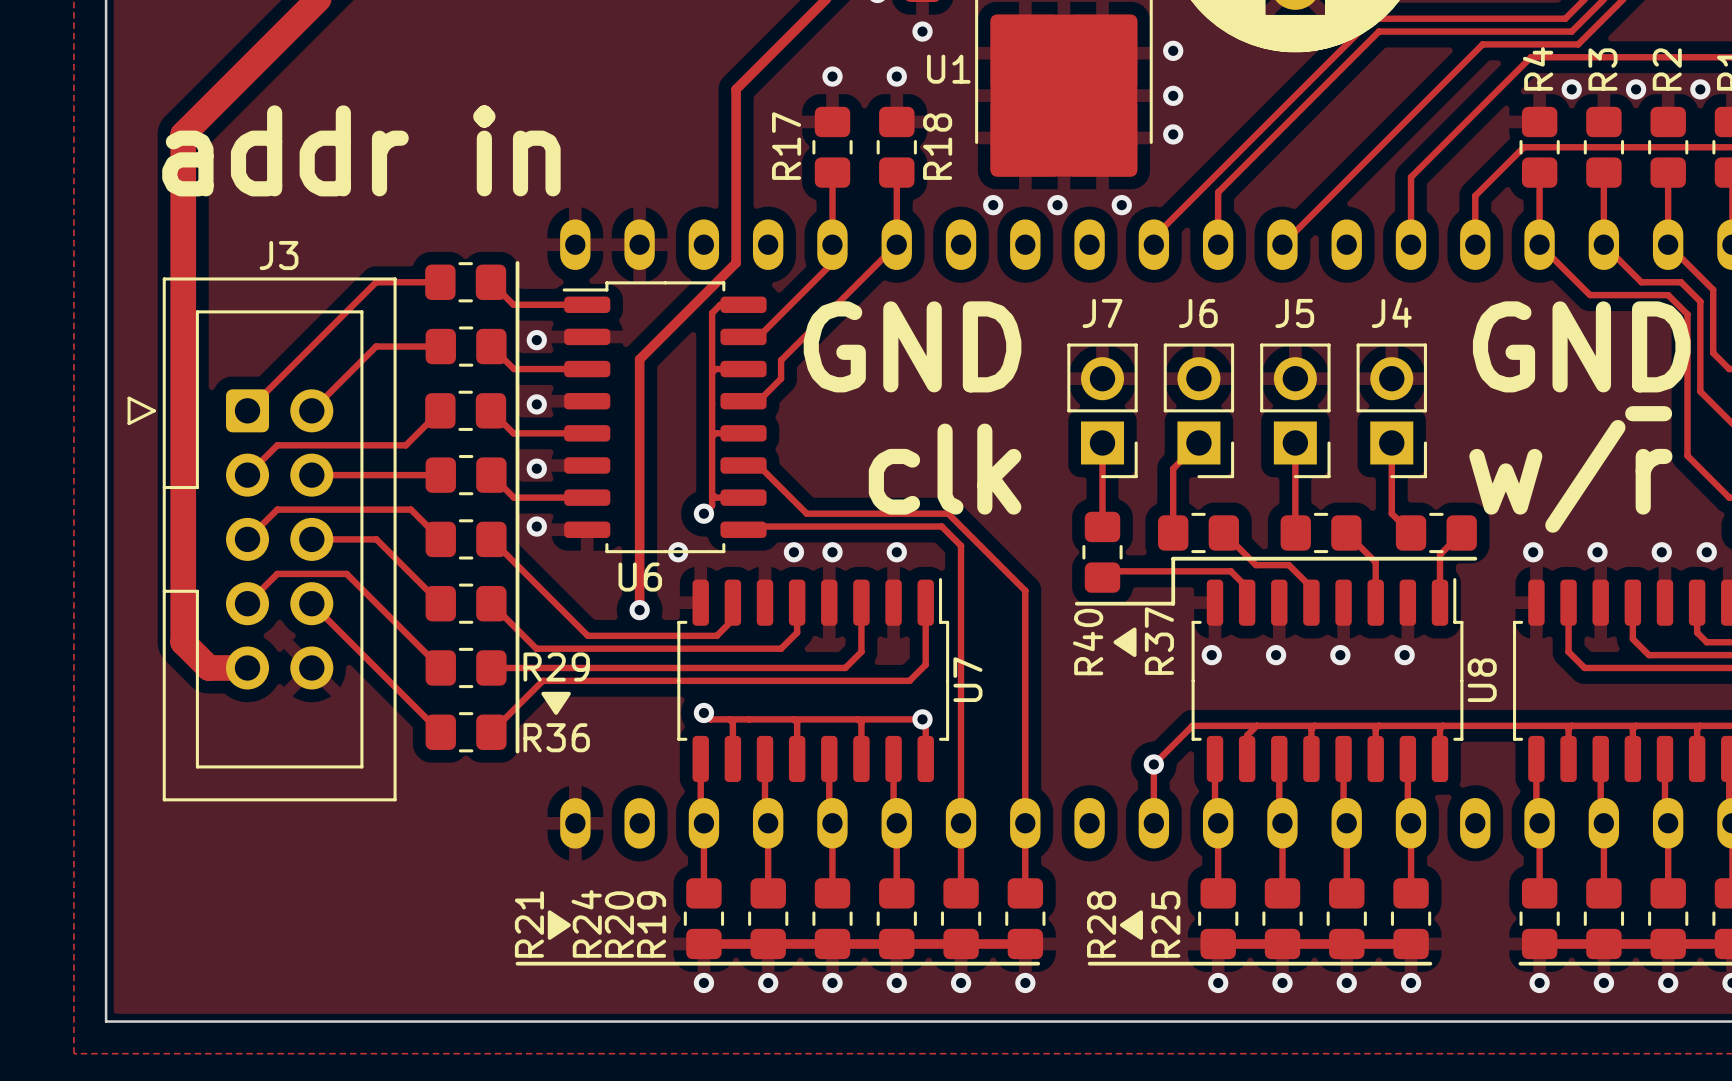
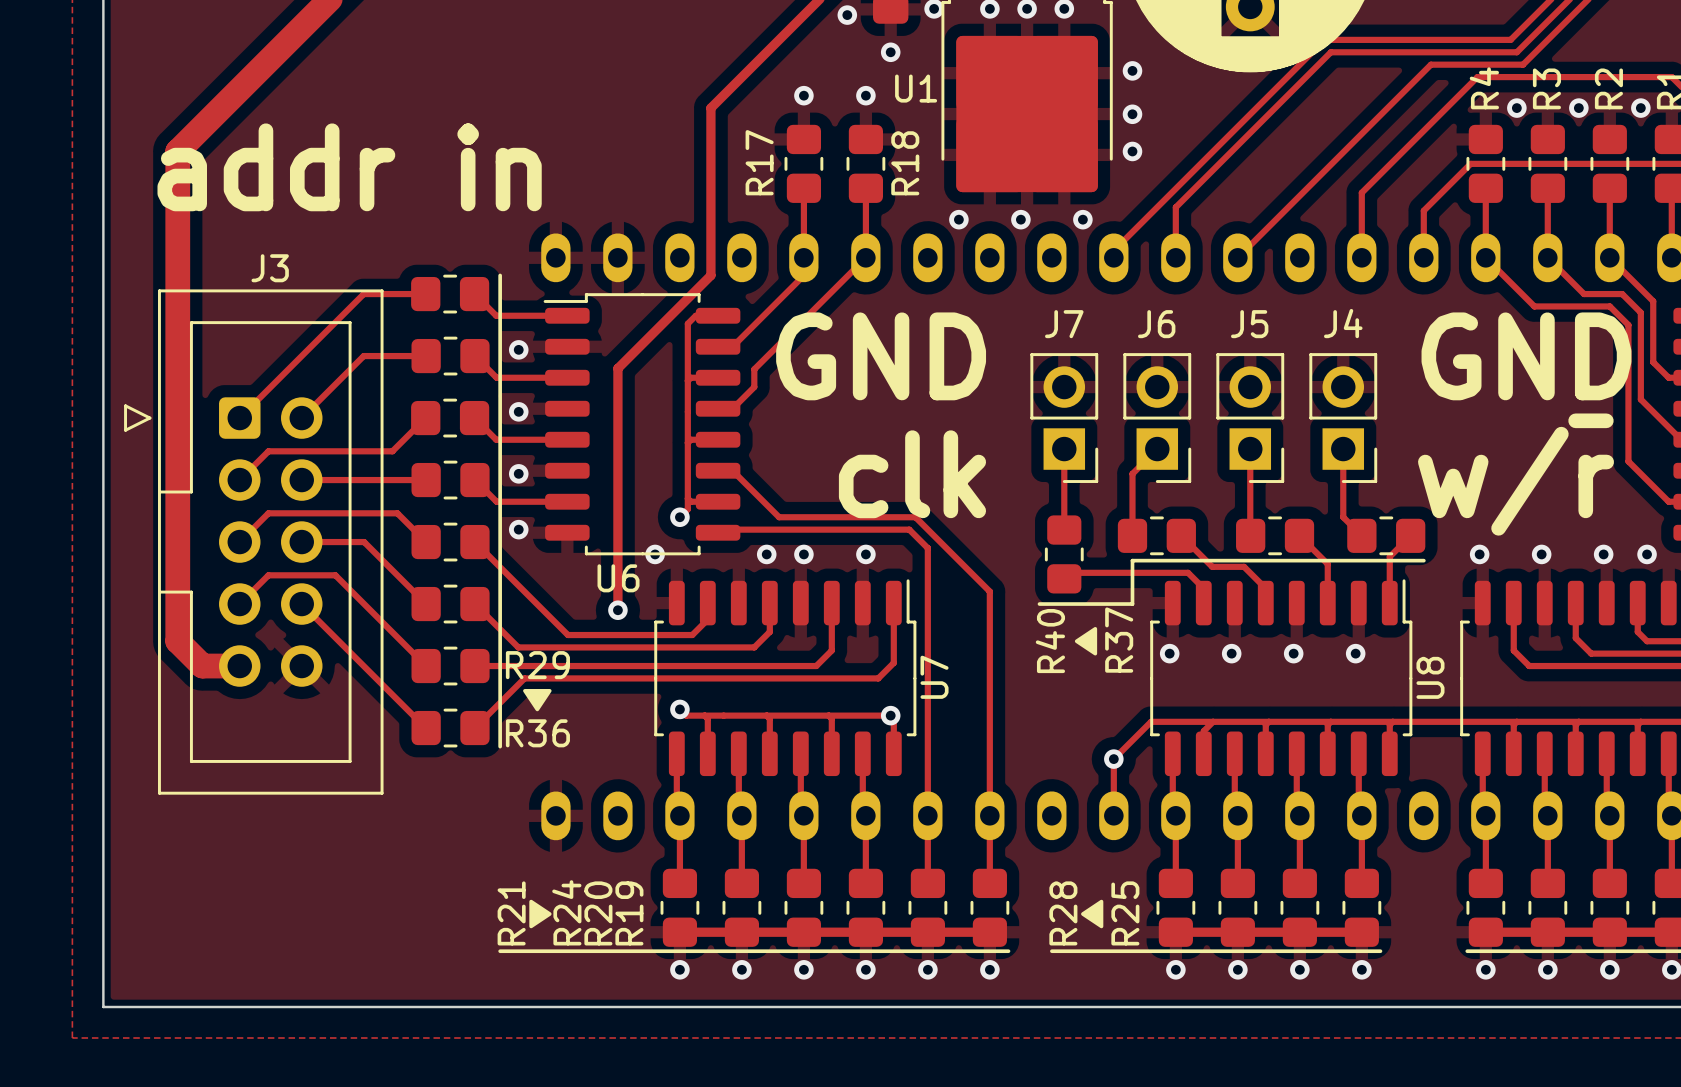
line: none -> (1002, 951) (1008, 951)

